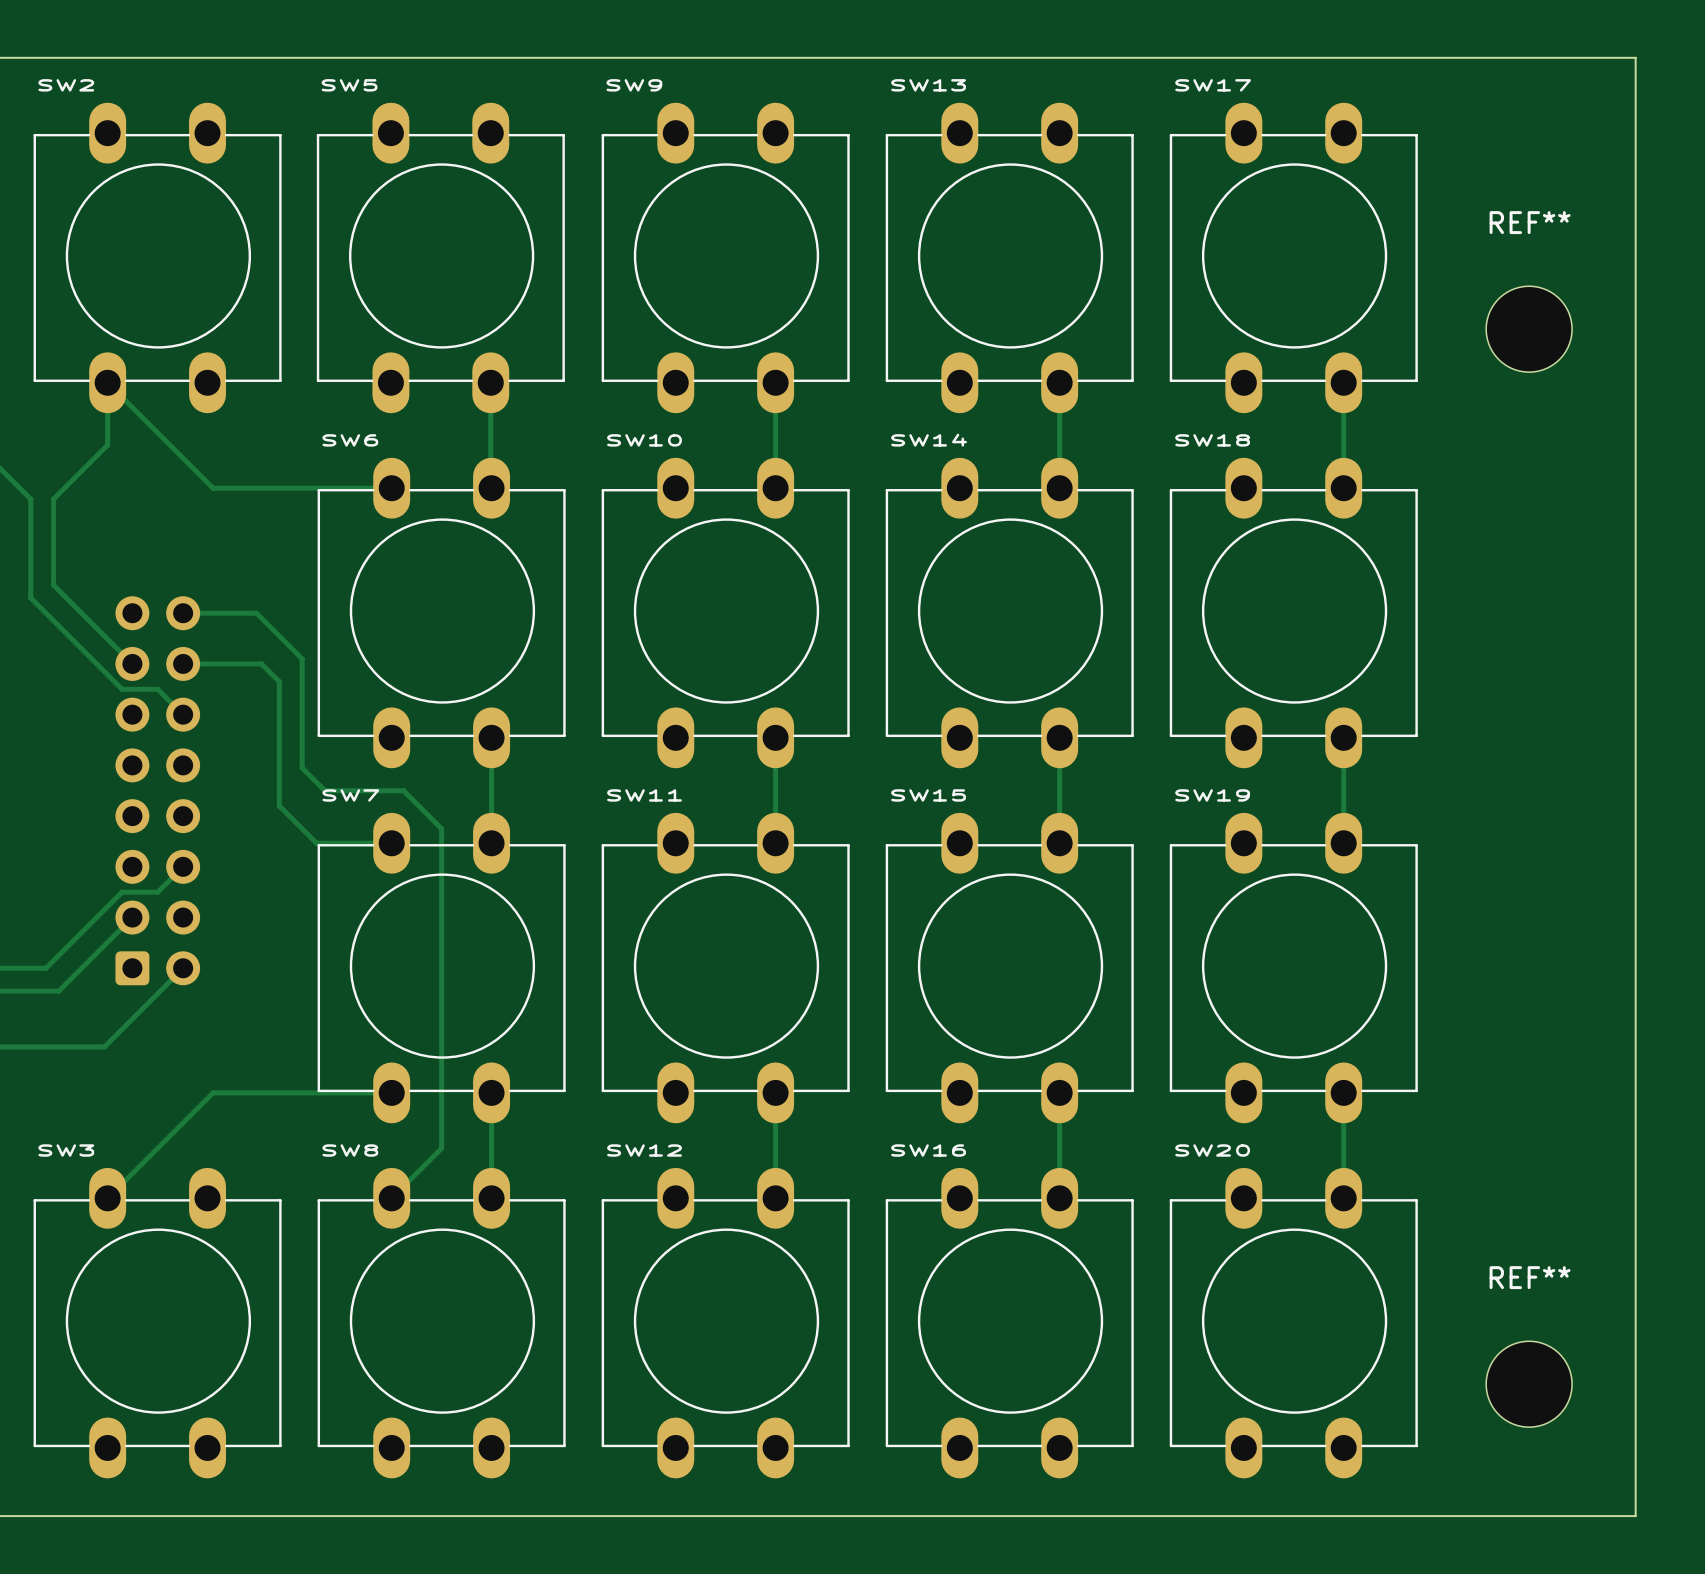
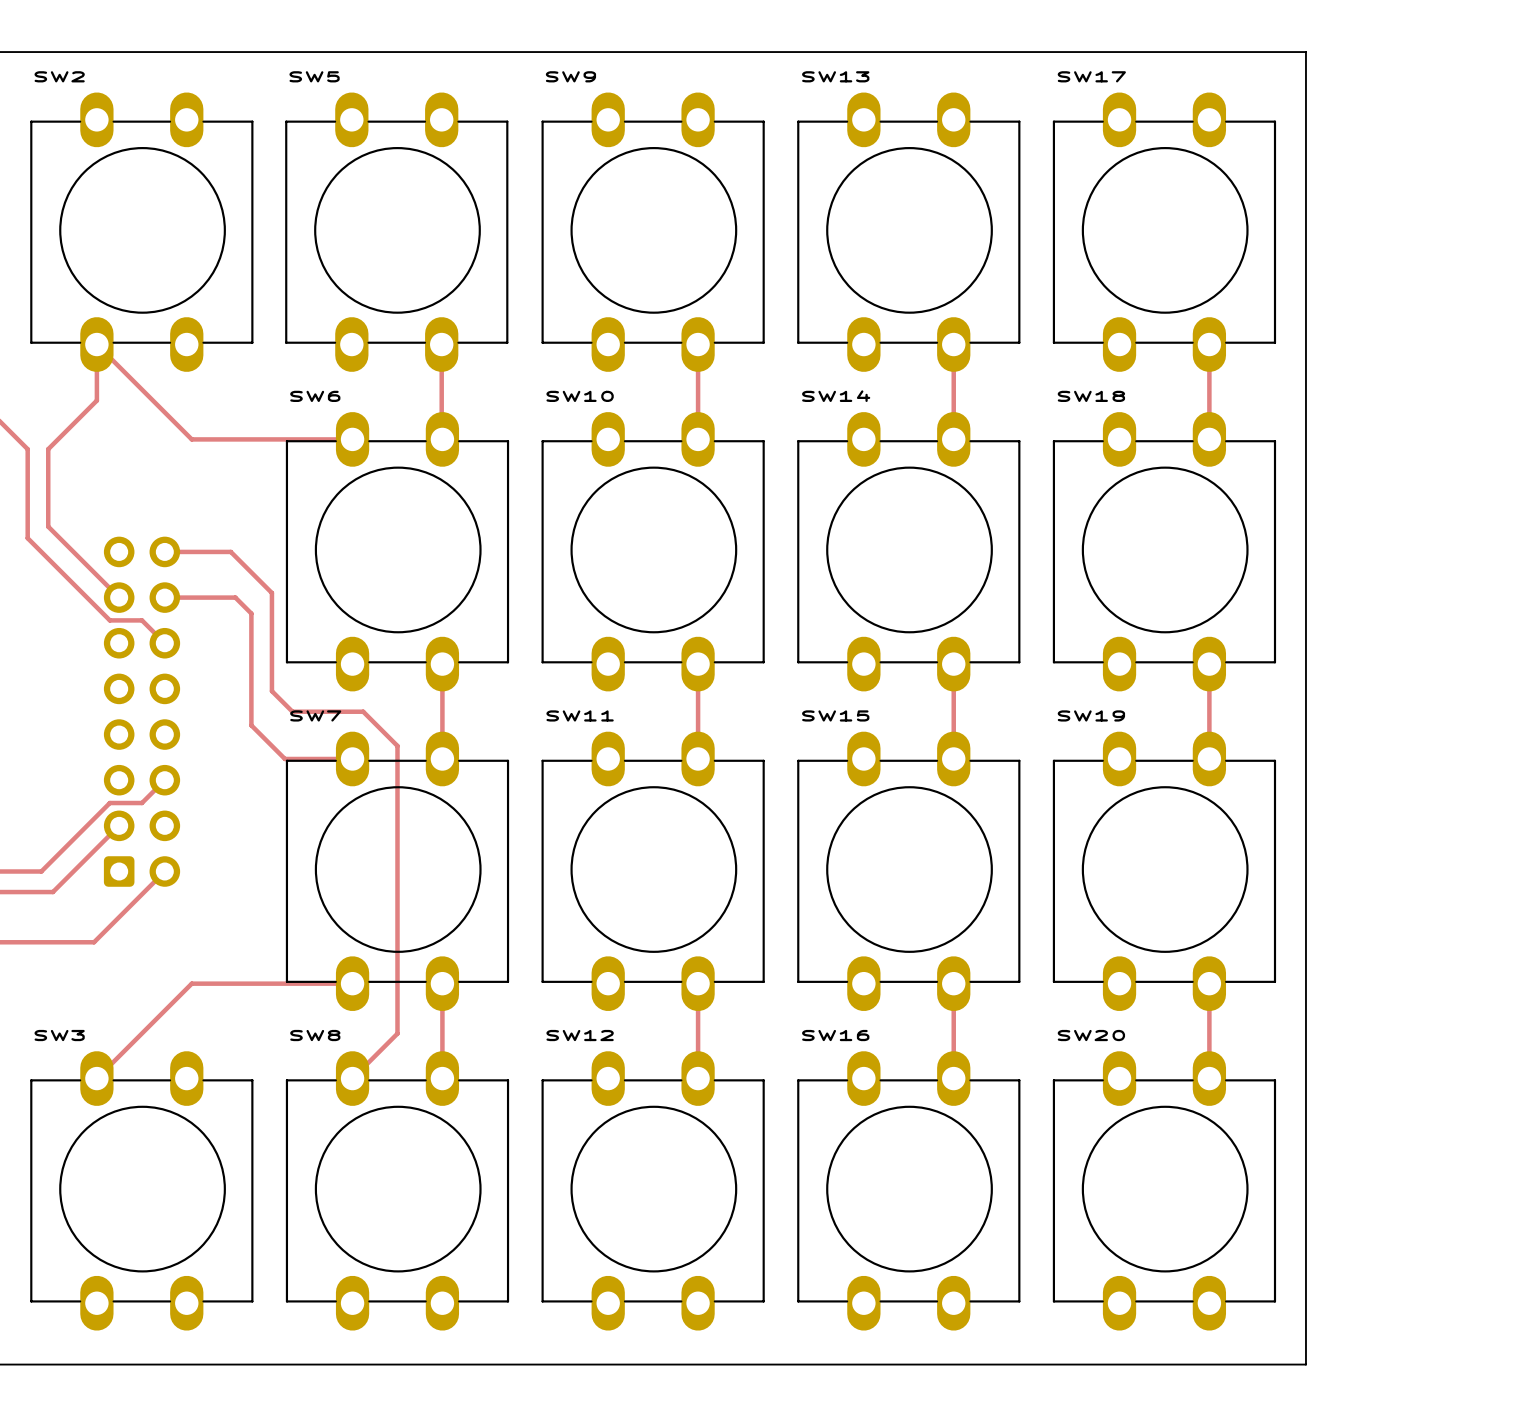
board edge: (1451, 57) (1635, 57) (1635, 1516) (1451, 1516) -> (1305, 52) (1305, 1364)
REF**: (1529, 329) -> none
REF**: (1529, 1384) -> none

